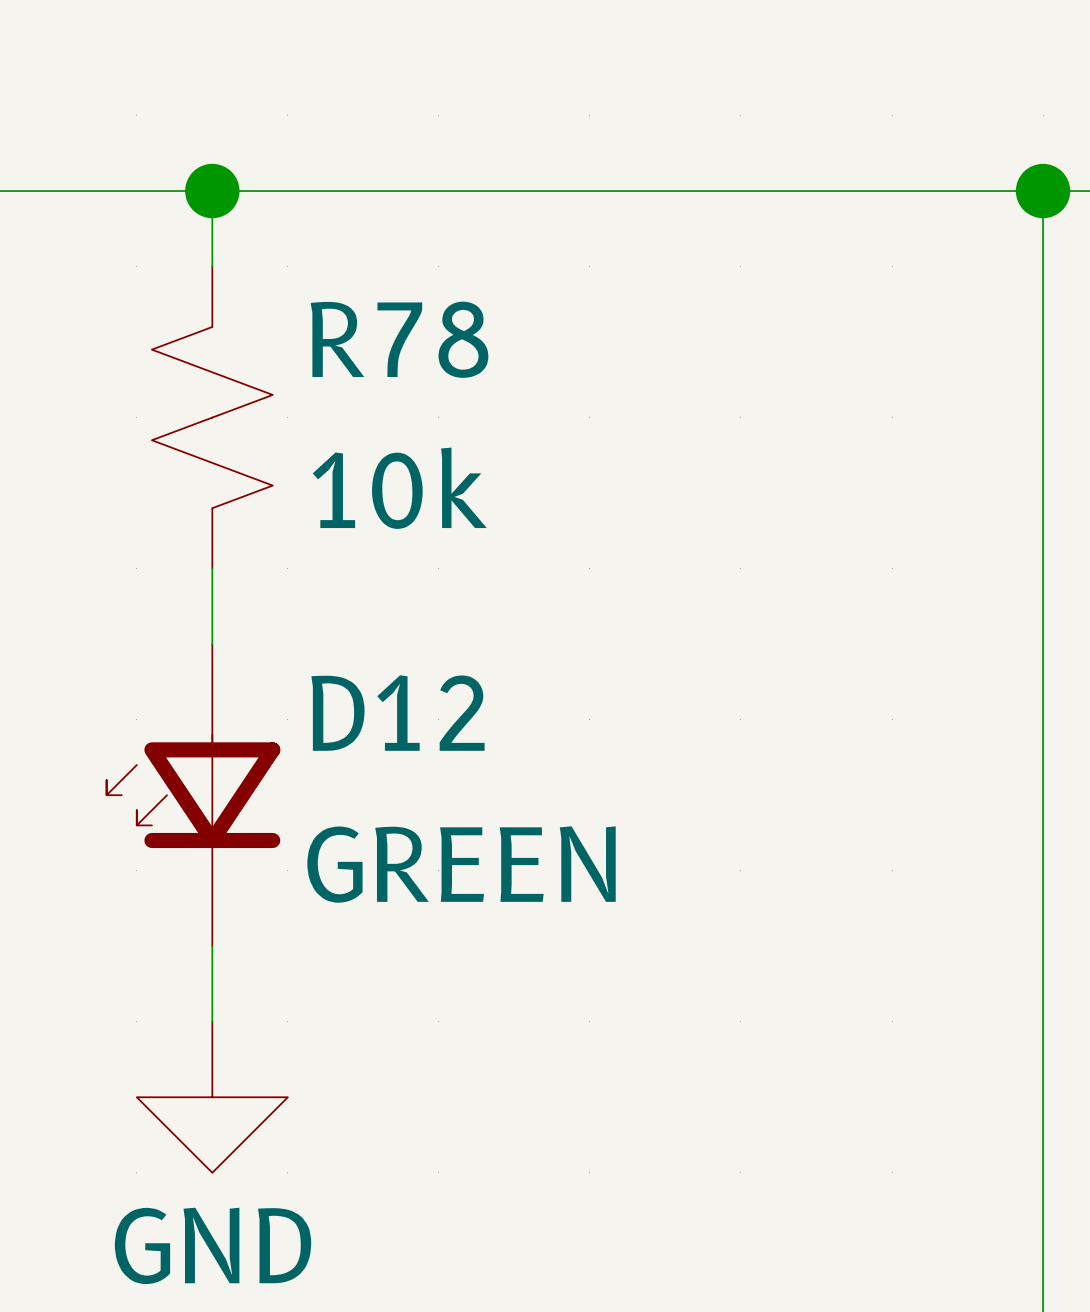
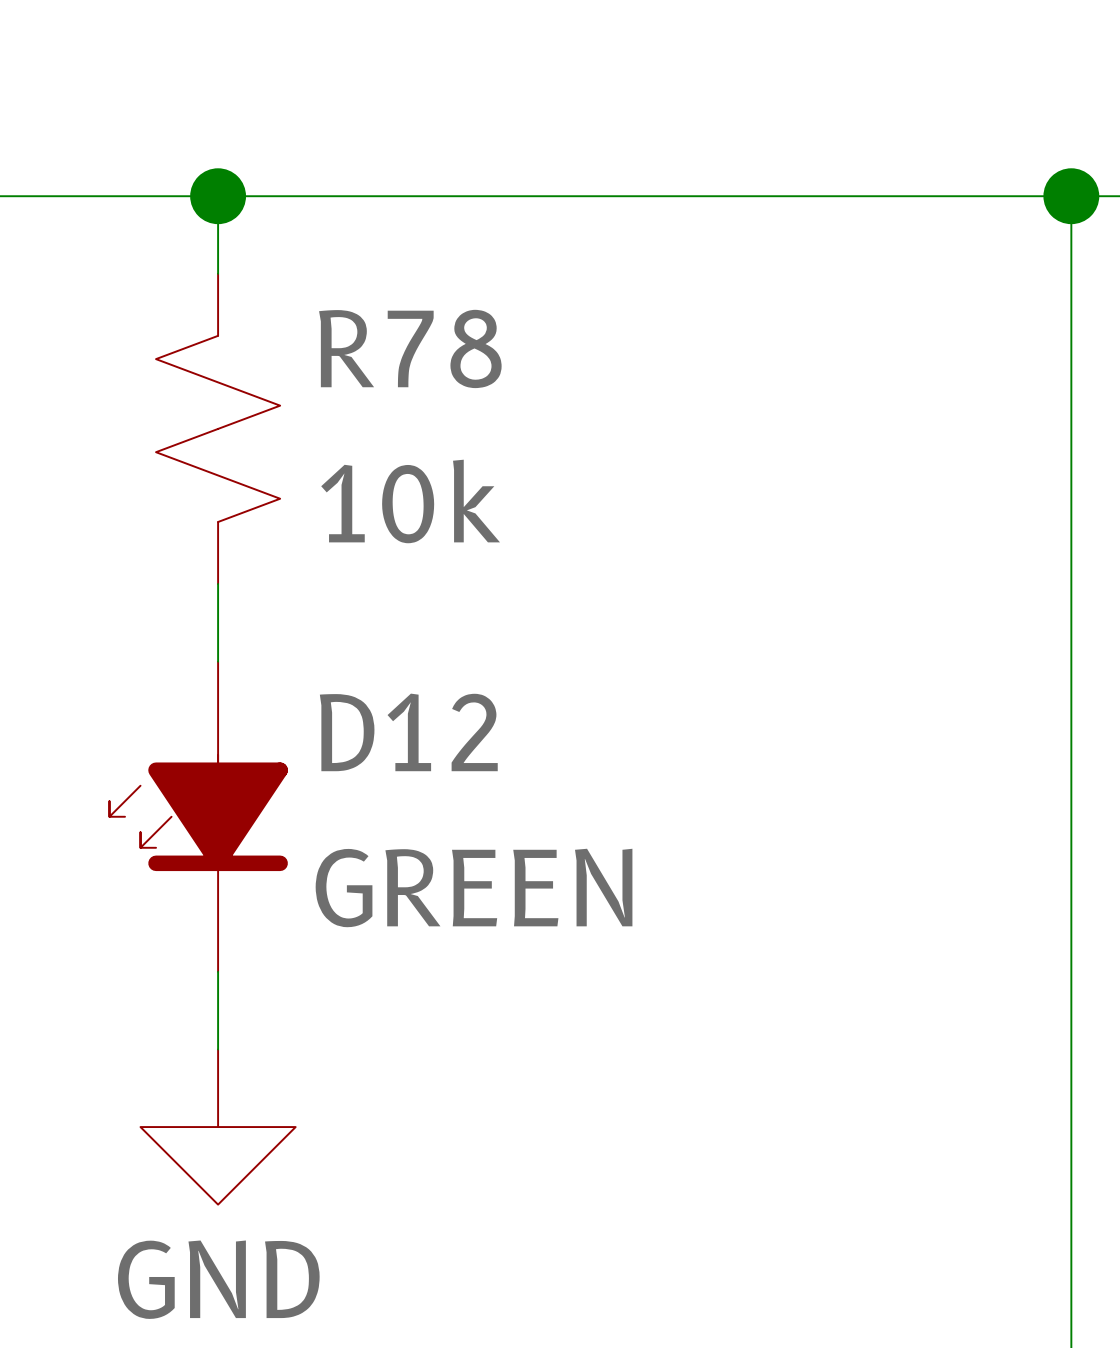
D12 symbol: [106, 644, 281, 947] -> [109, 661, 288, 972]

